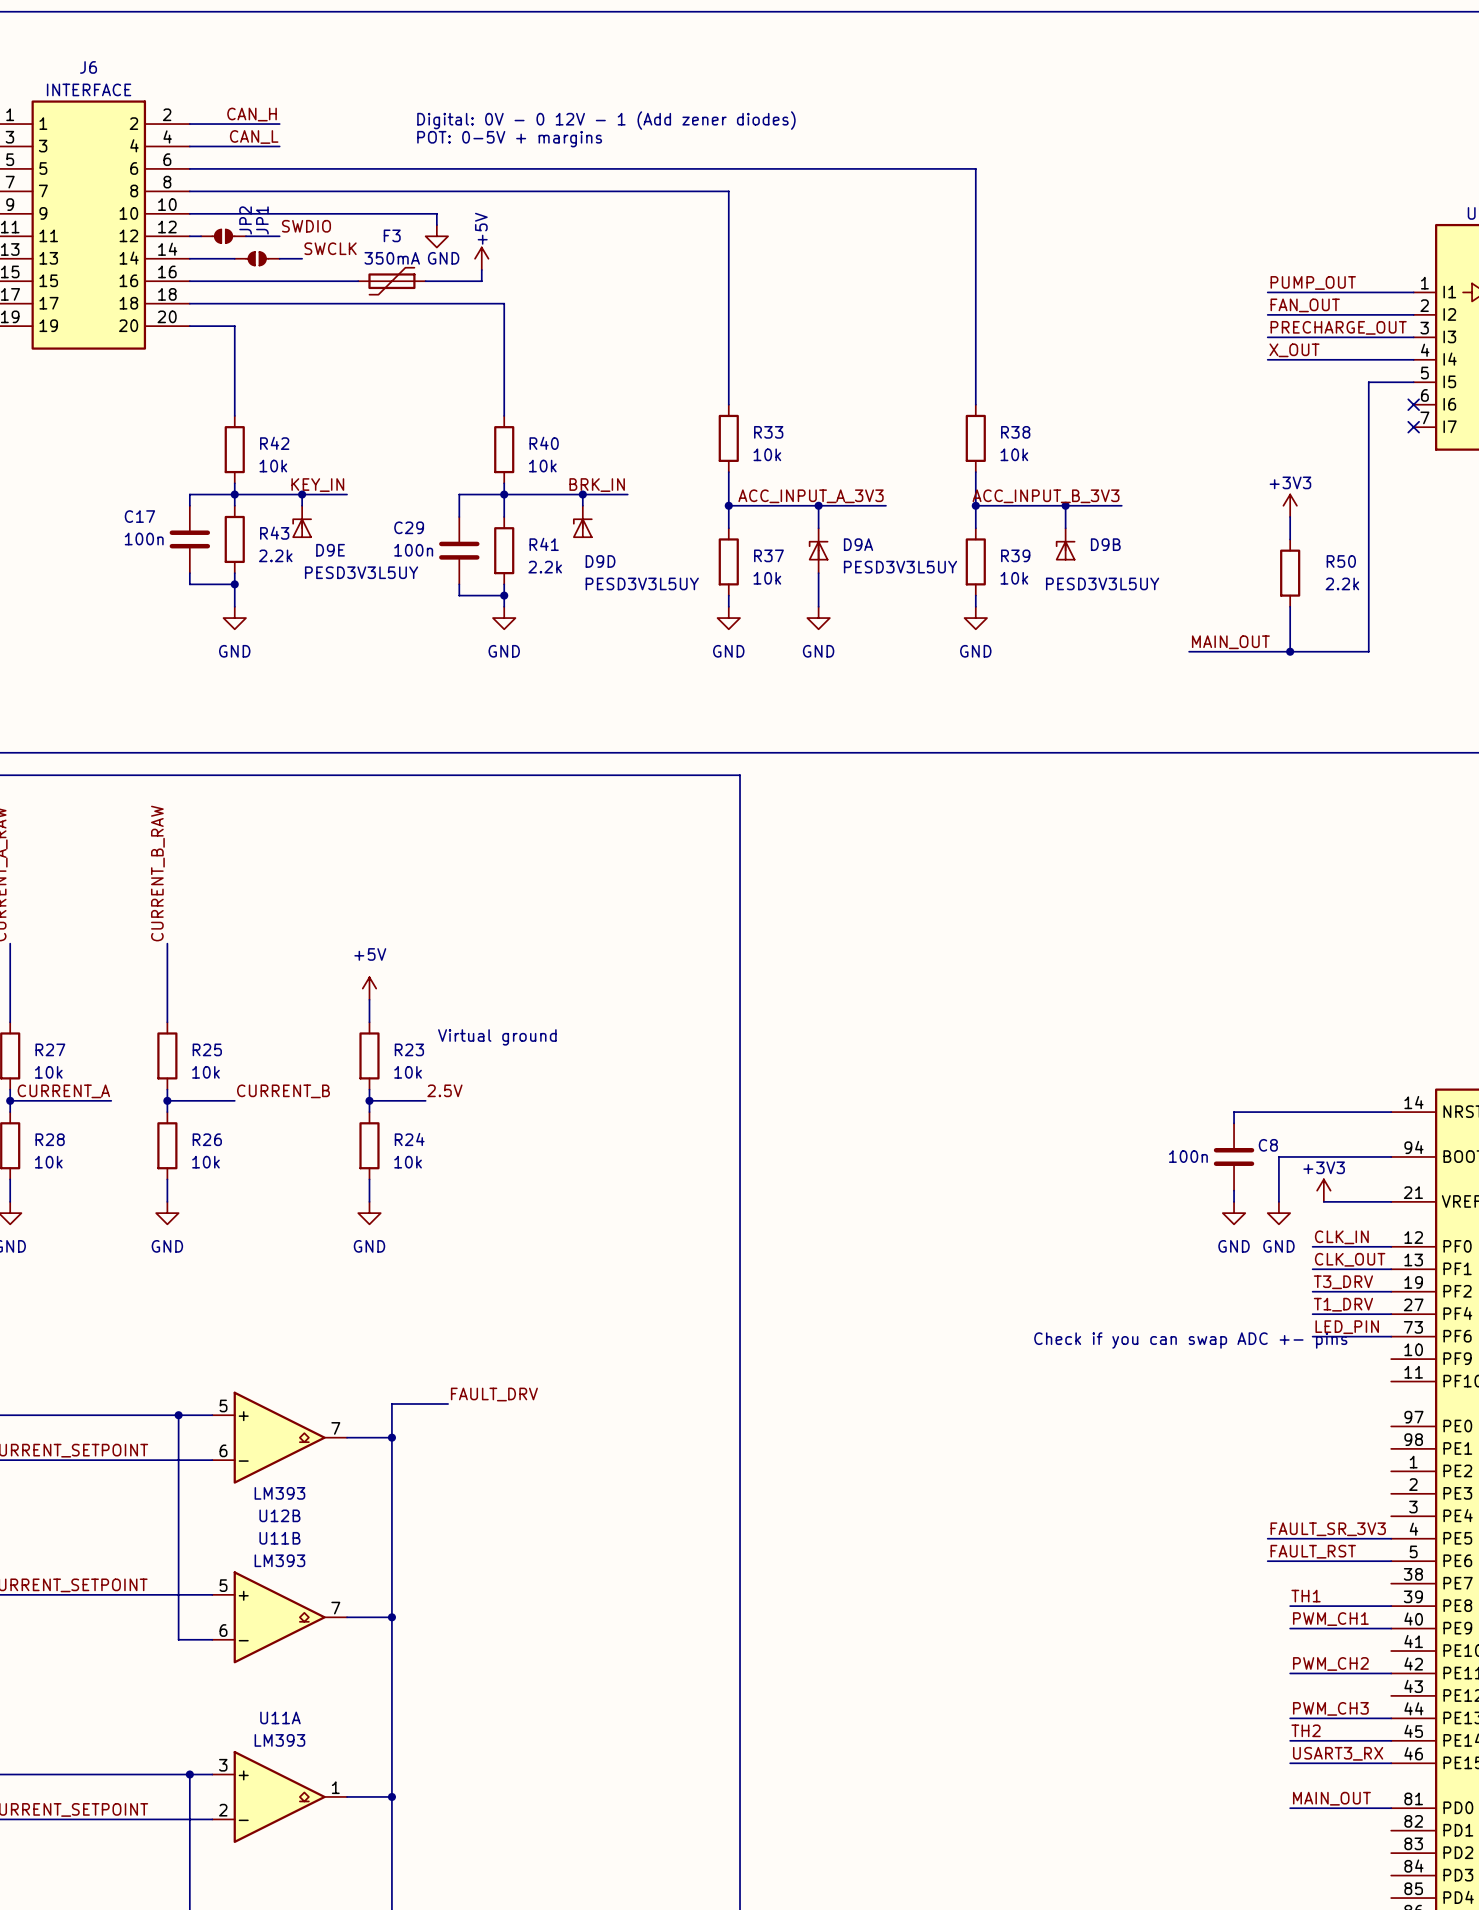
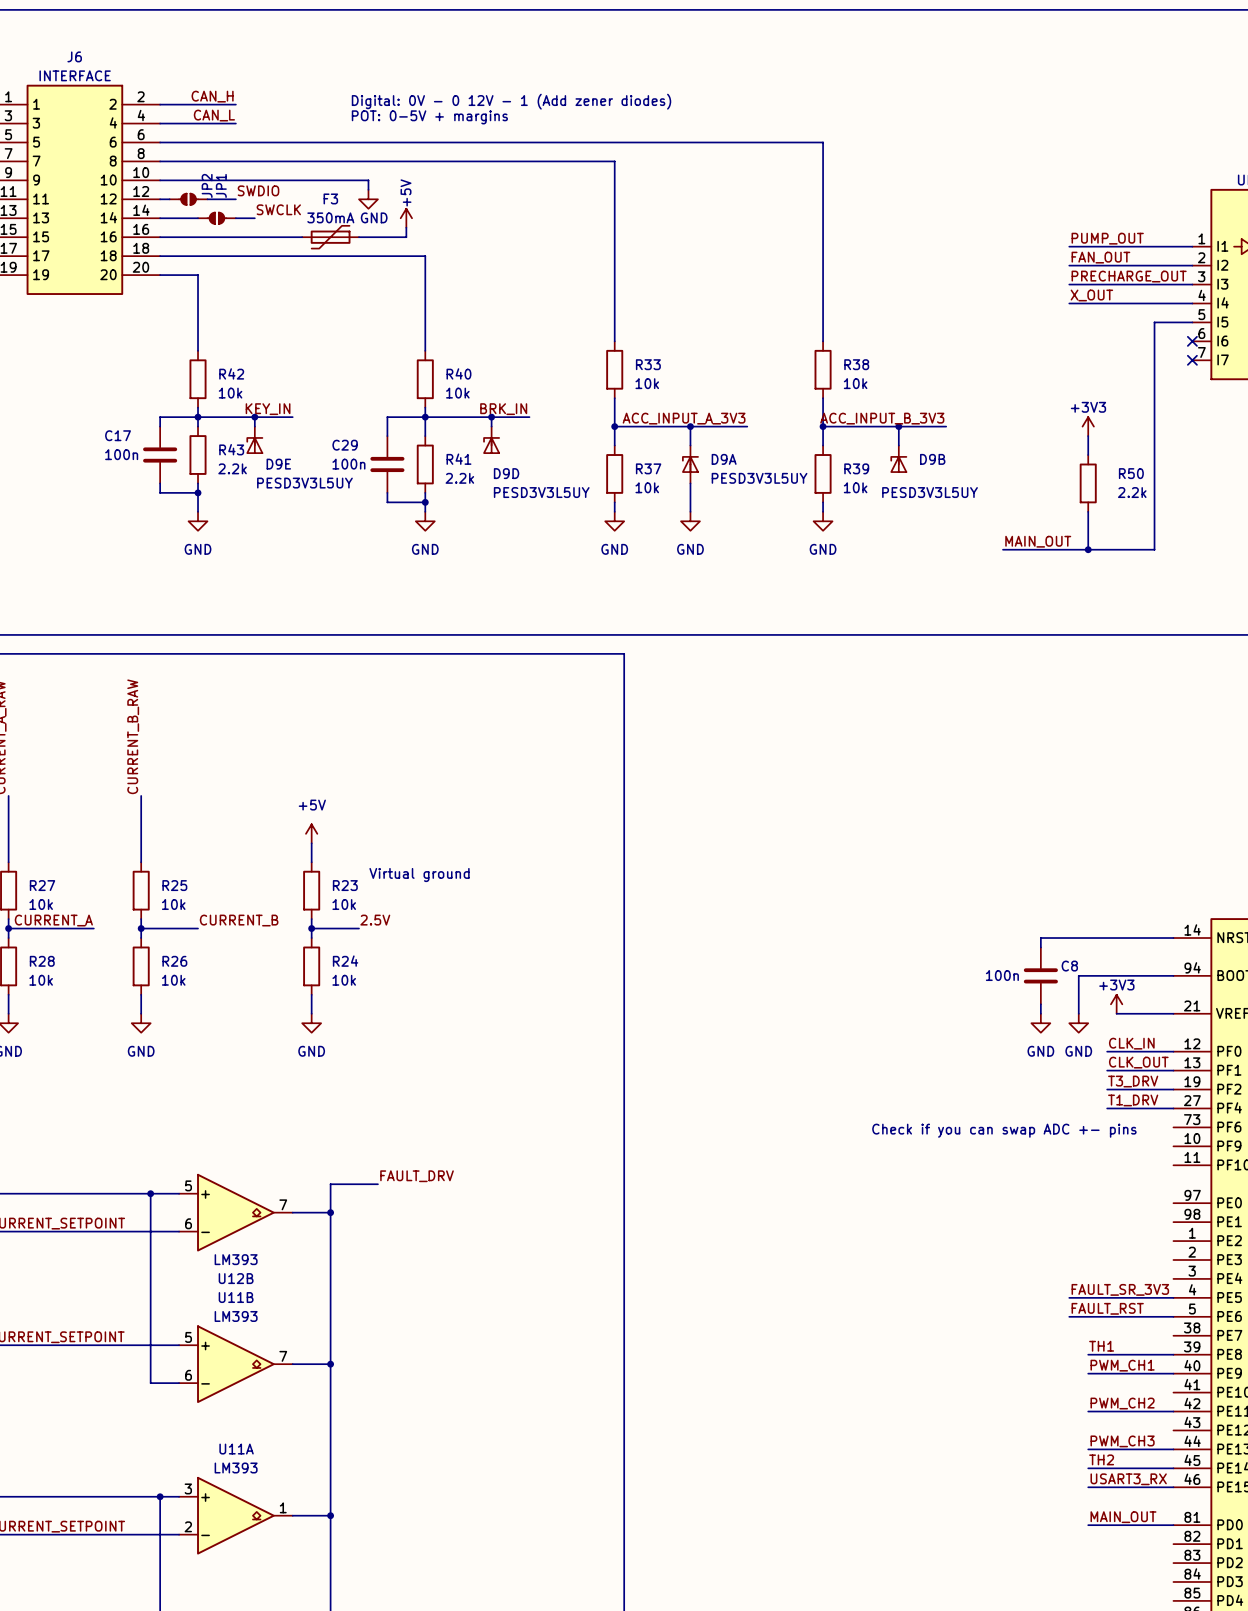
label: LED_PIN (1347, 1327) -> none
wire: (1312, 1336) (1391, 1336) -> none

